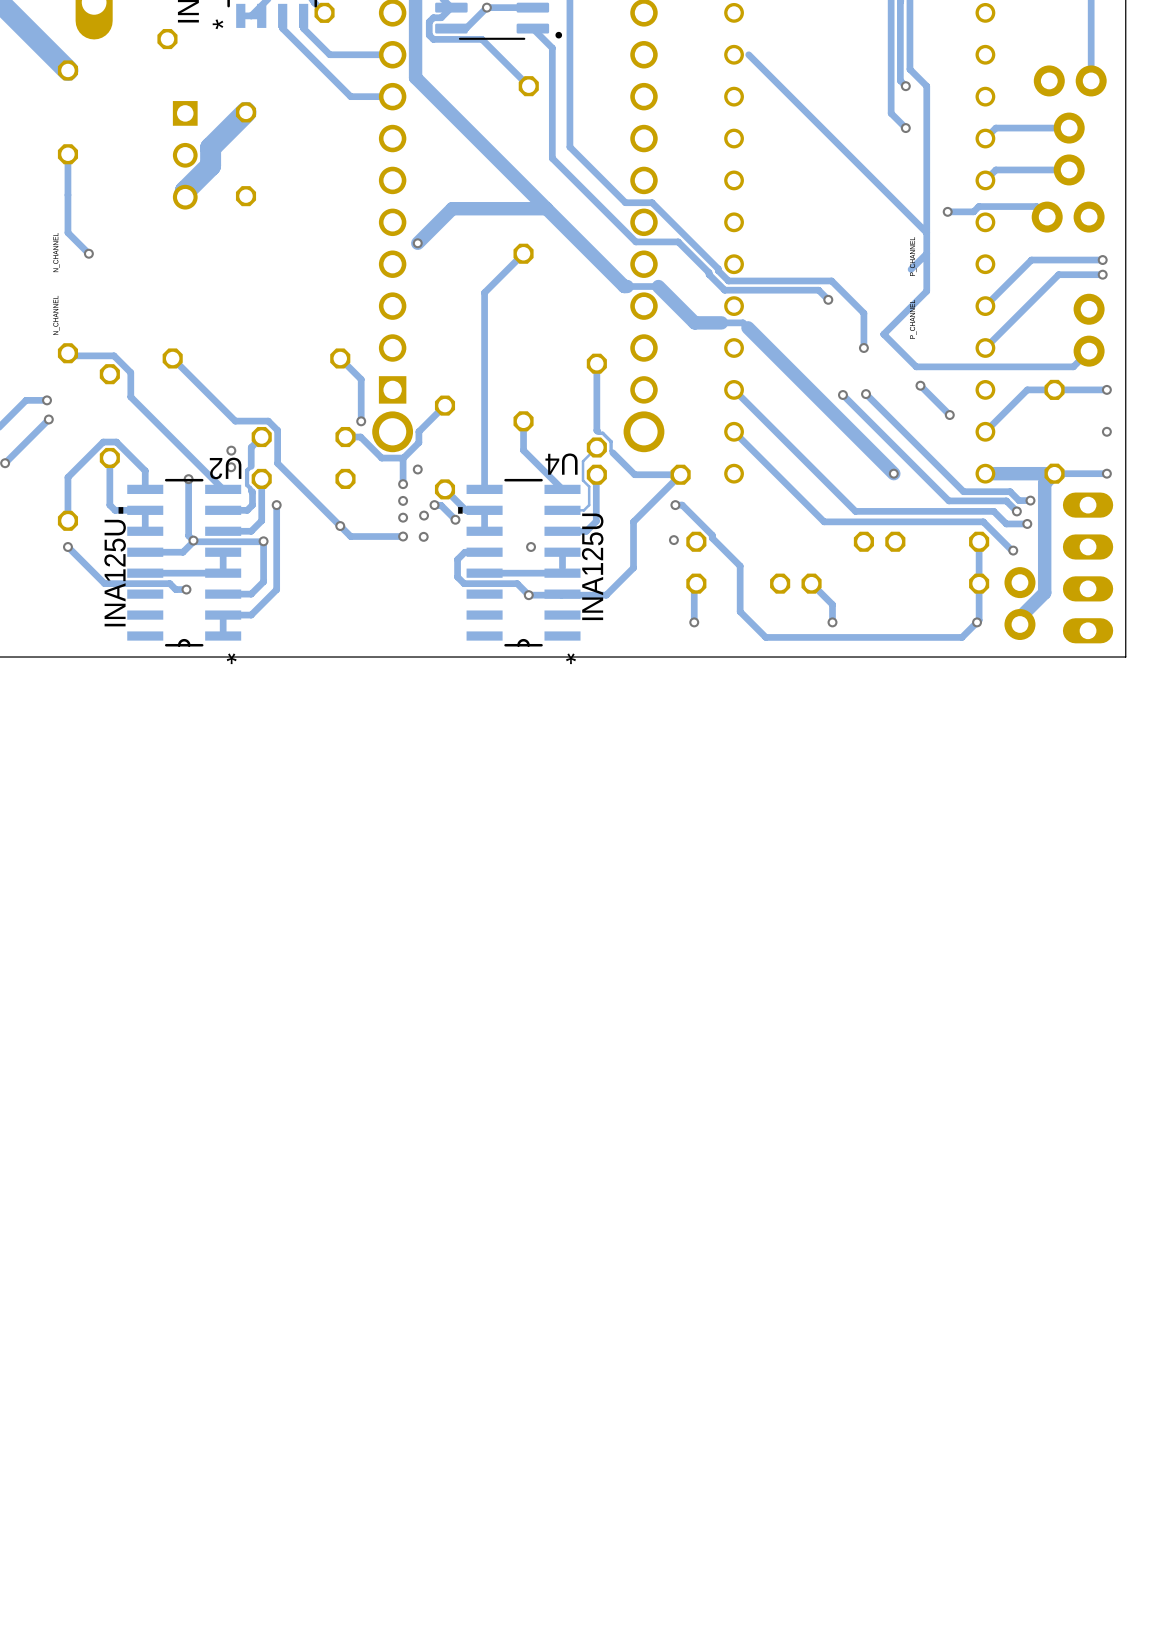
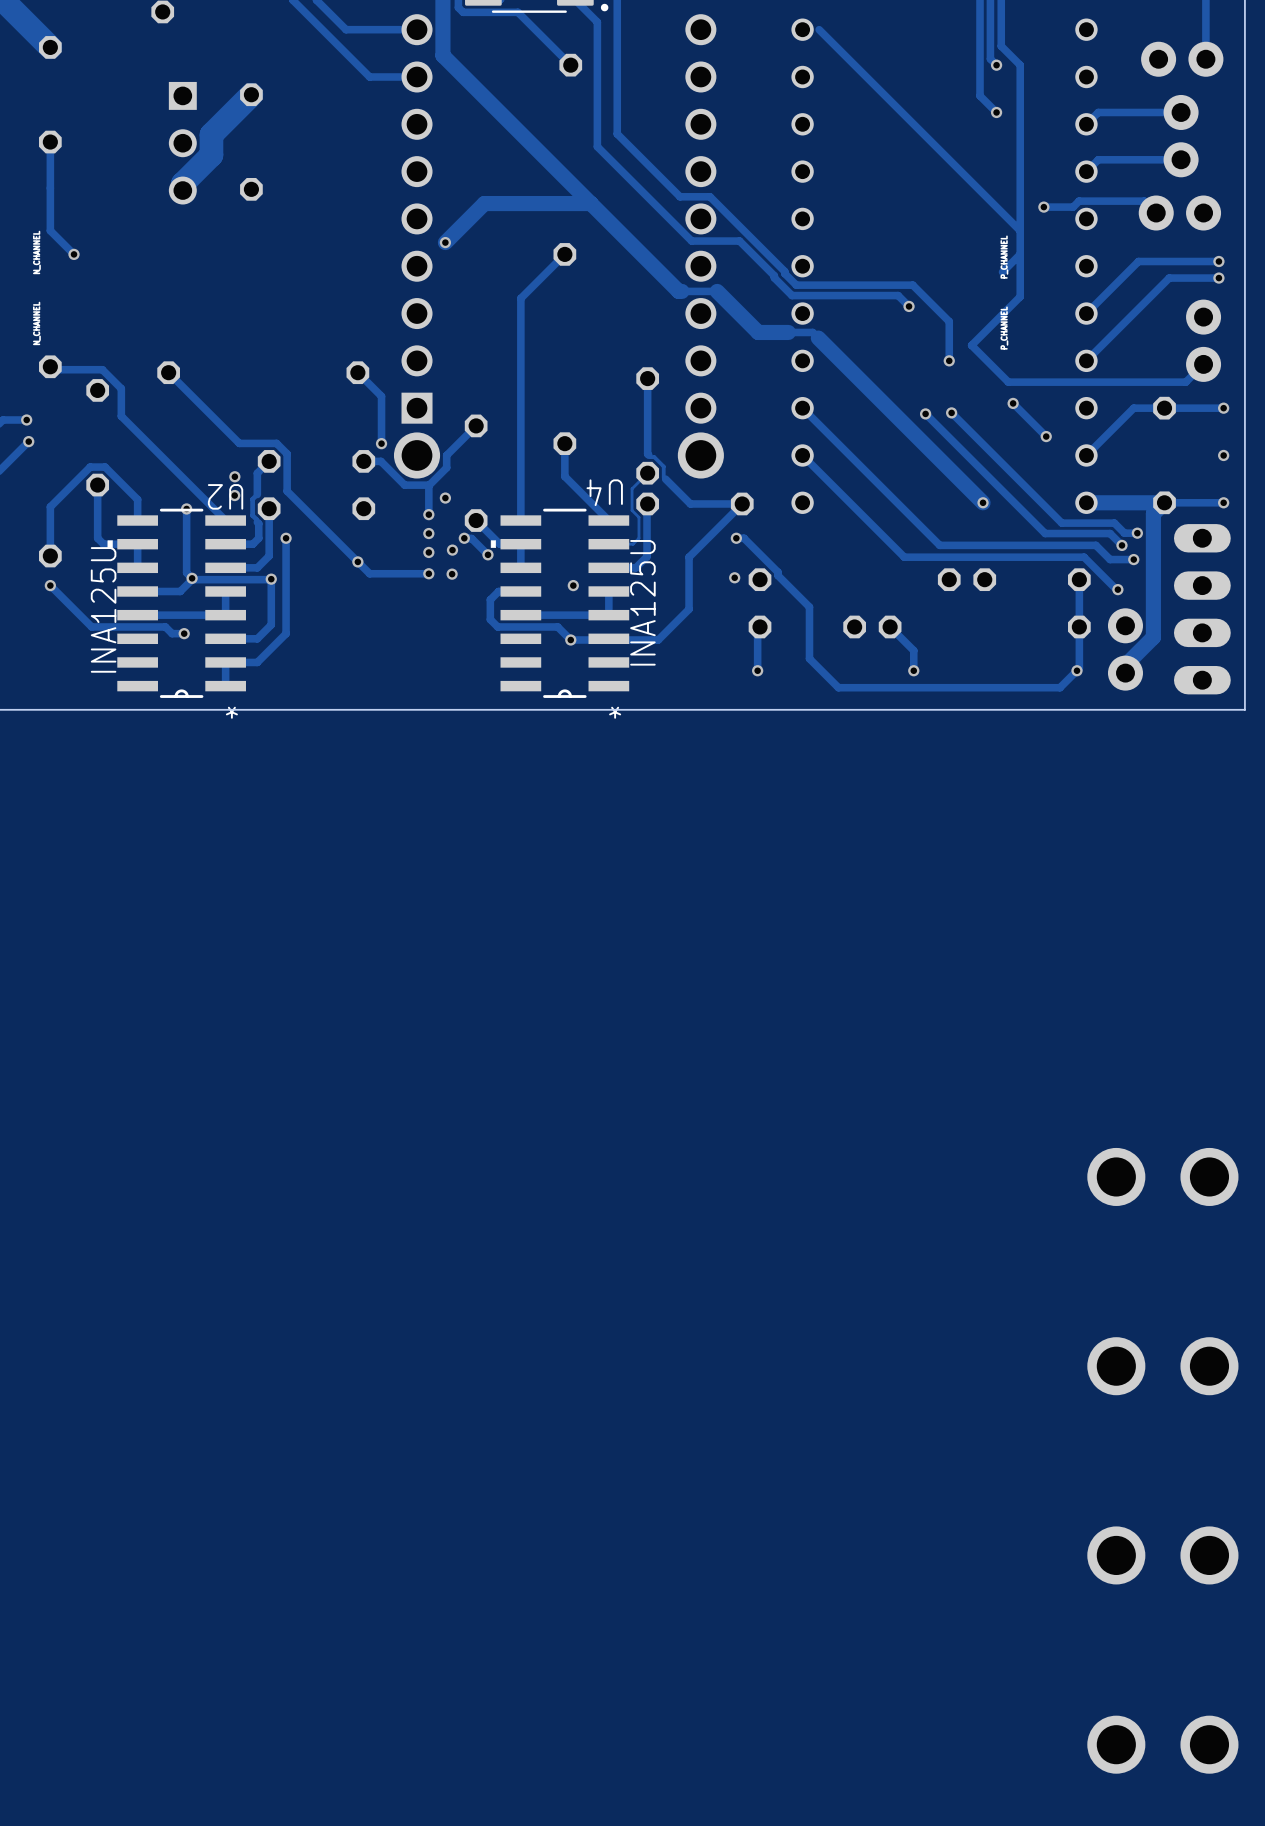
part: none -> (1162, 1176)
part: none -> (1162, 1366)
part: none -> (1162, 1555)
part: none -> (1162, 1744)

